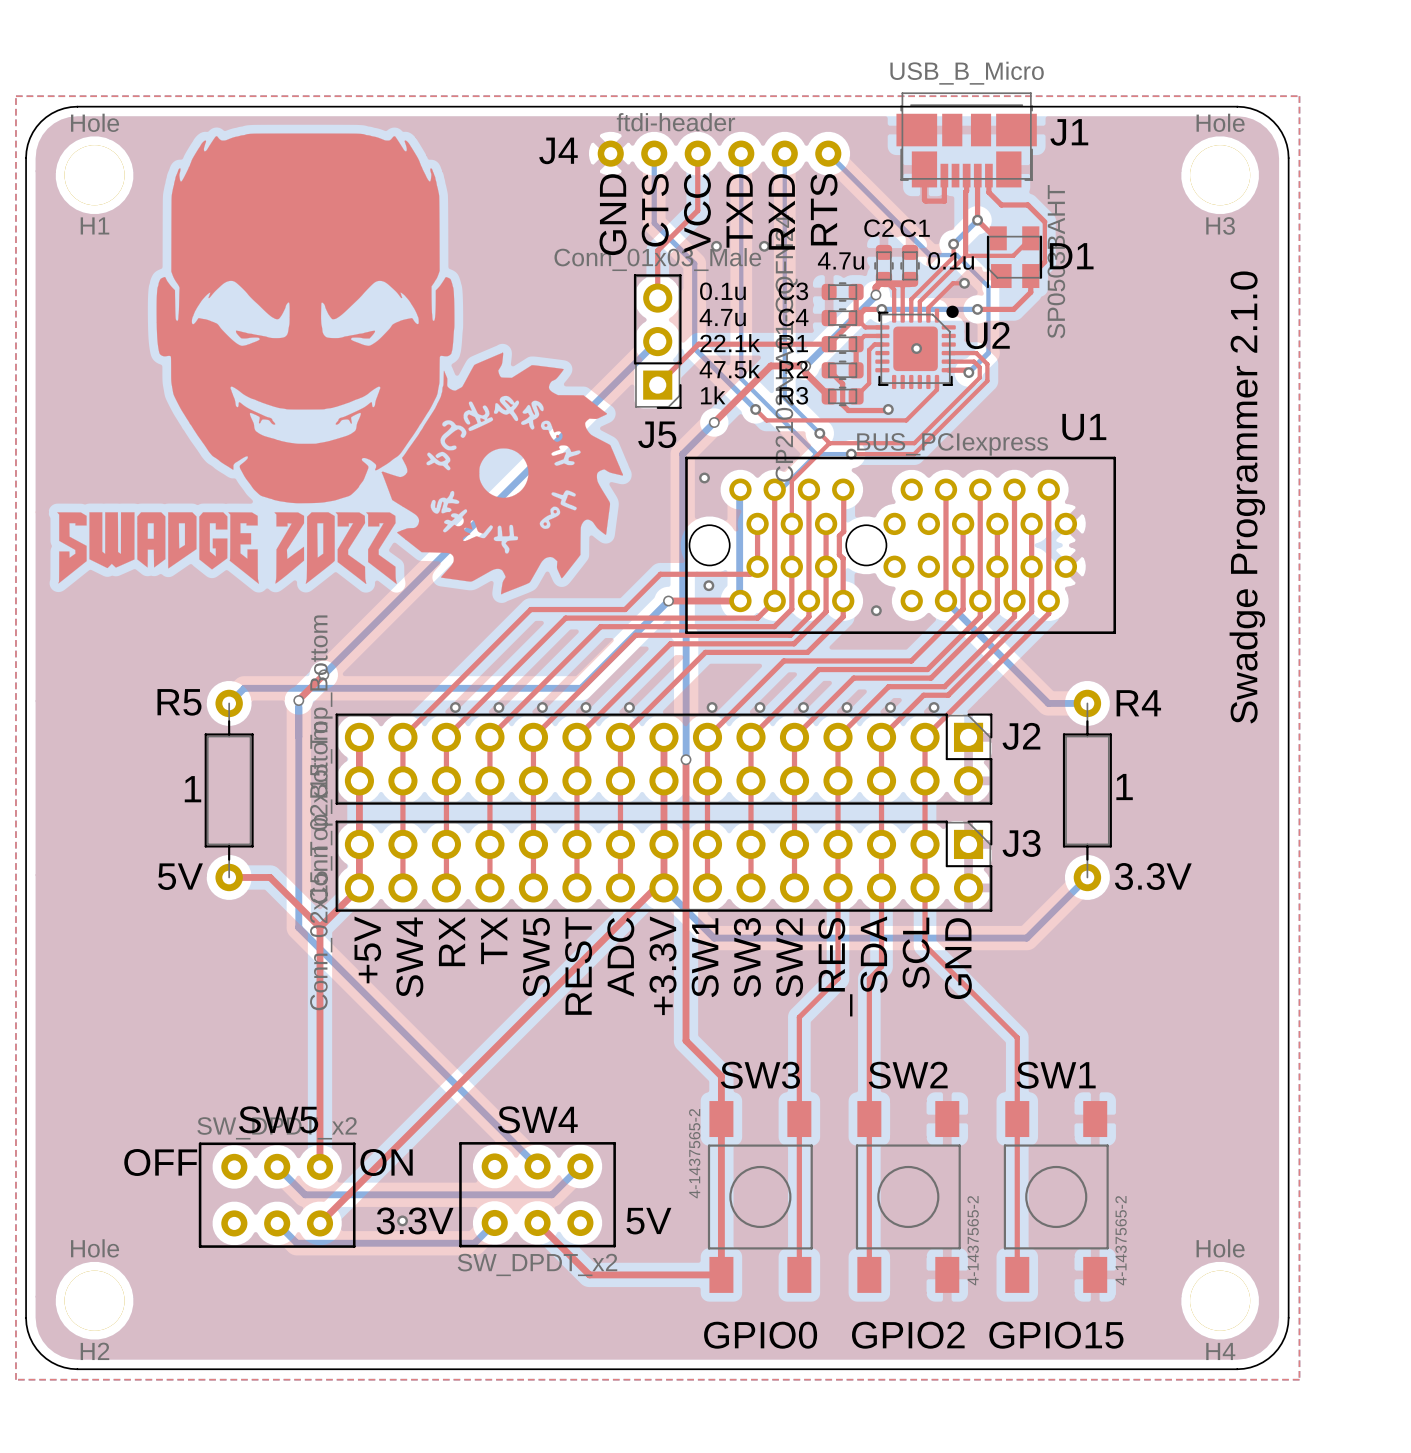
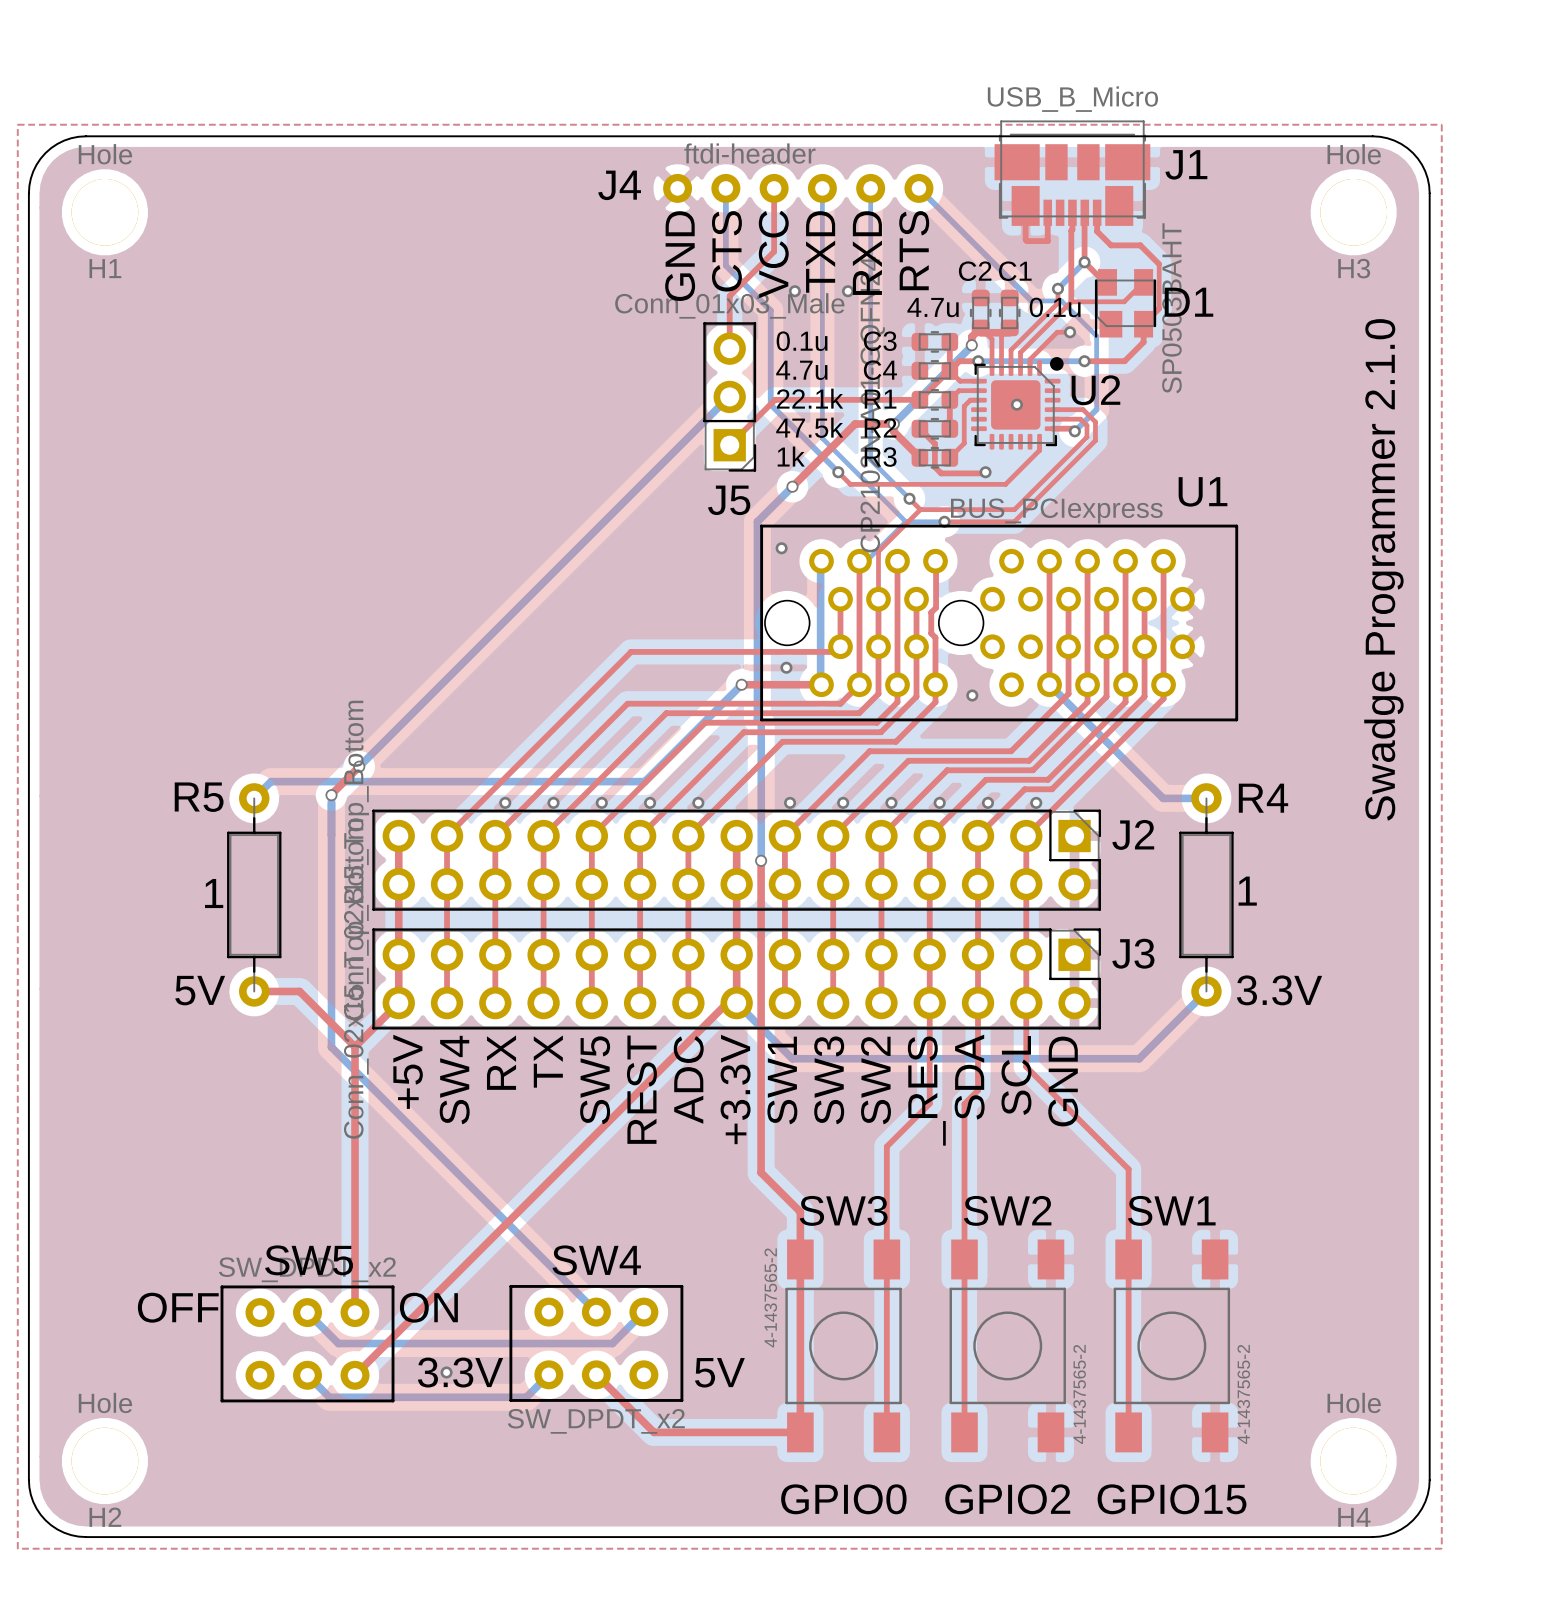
drawing: [57, 133, 623, 595] -> none
top track: (752, 571) (750, 574) (660, 574) (625, 609) (530, 609) -> (835, 651) (631, 651) (588, 694)

